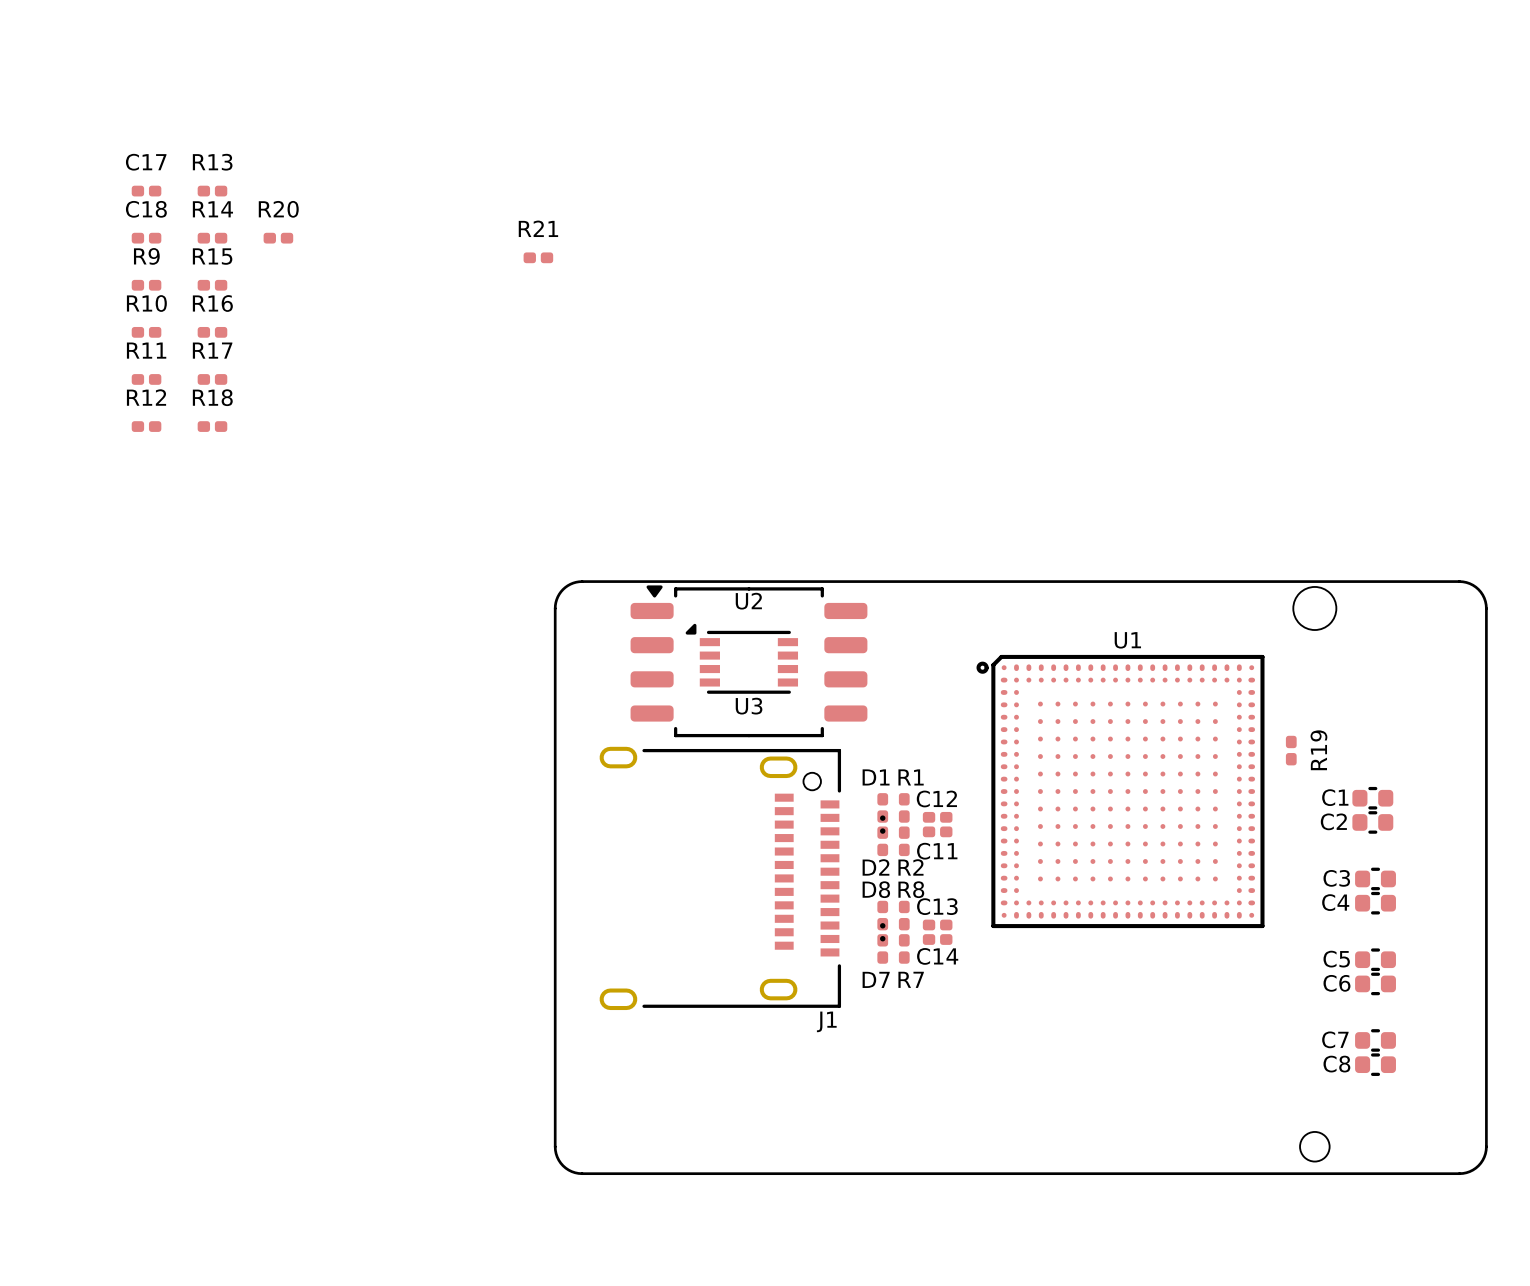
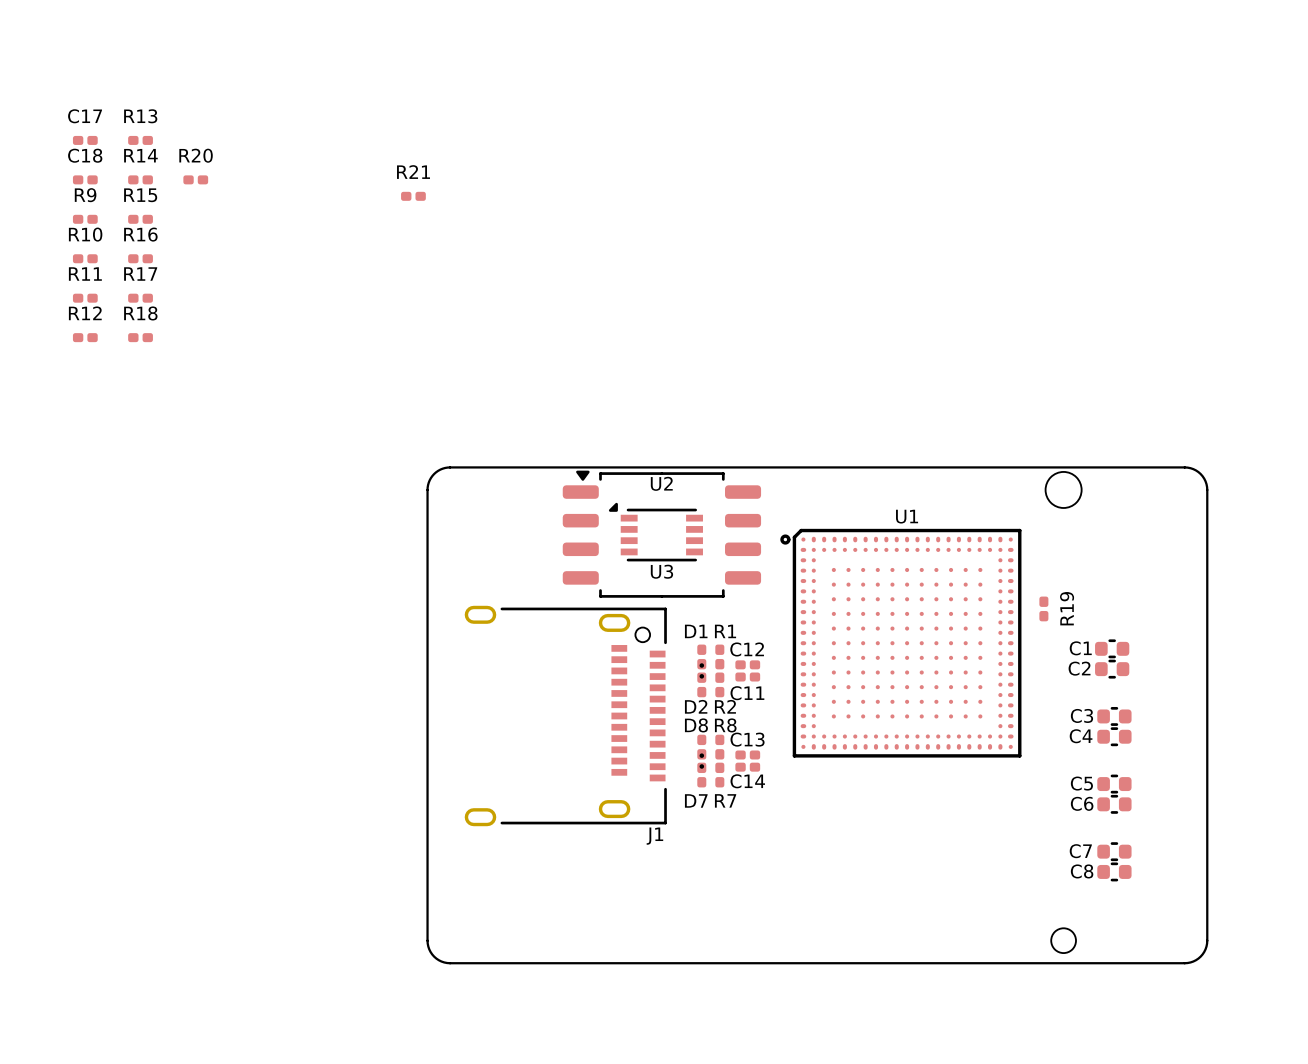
U3 position: (741, 658) -> (655, 532)
U2 position: (748, 661) -> (661, 534)

